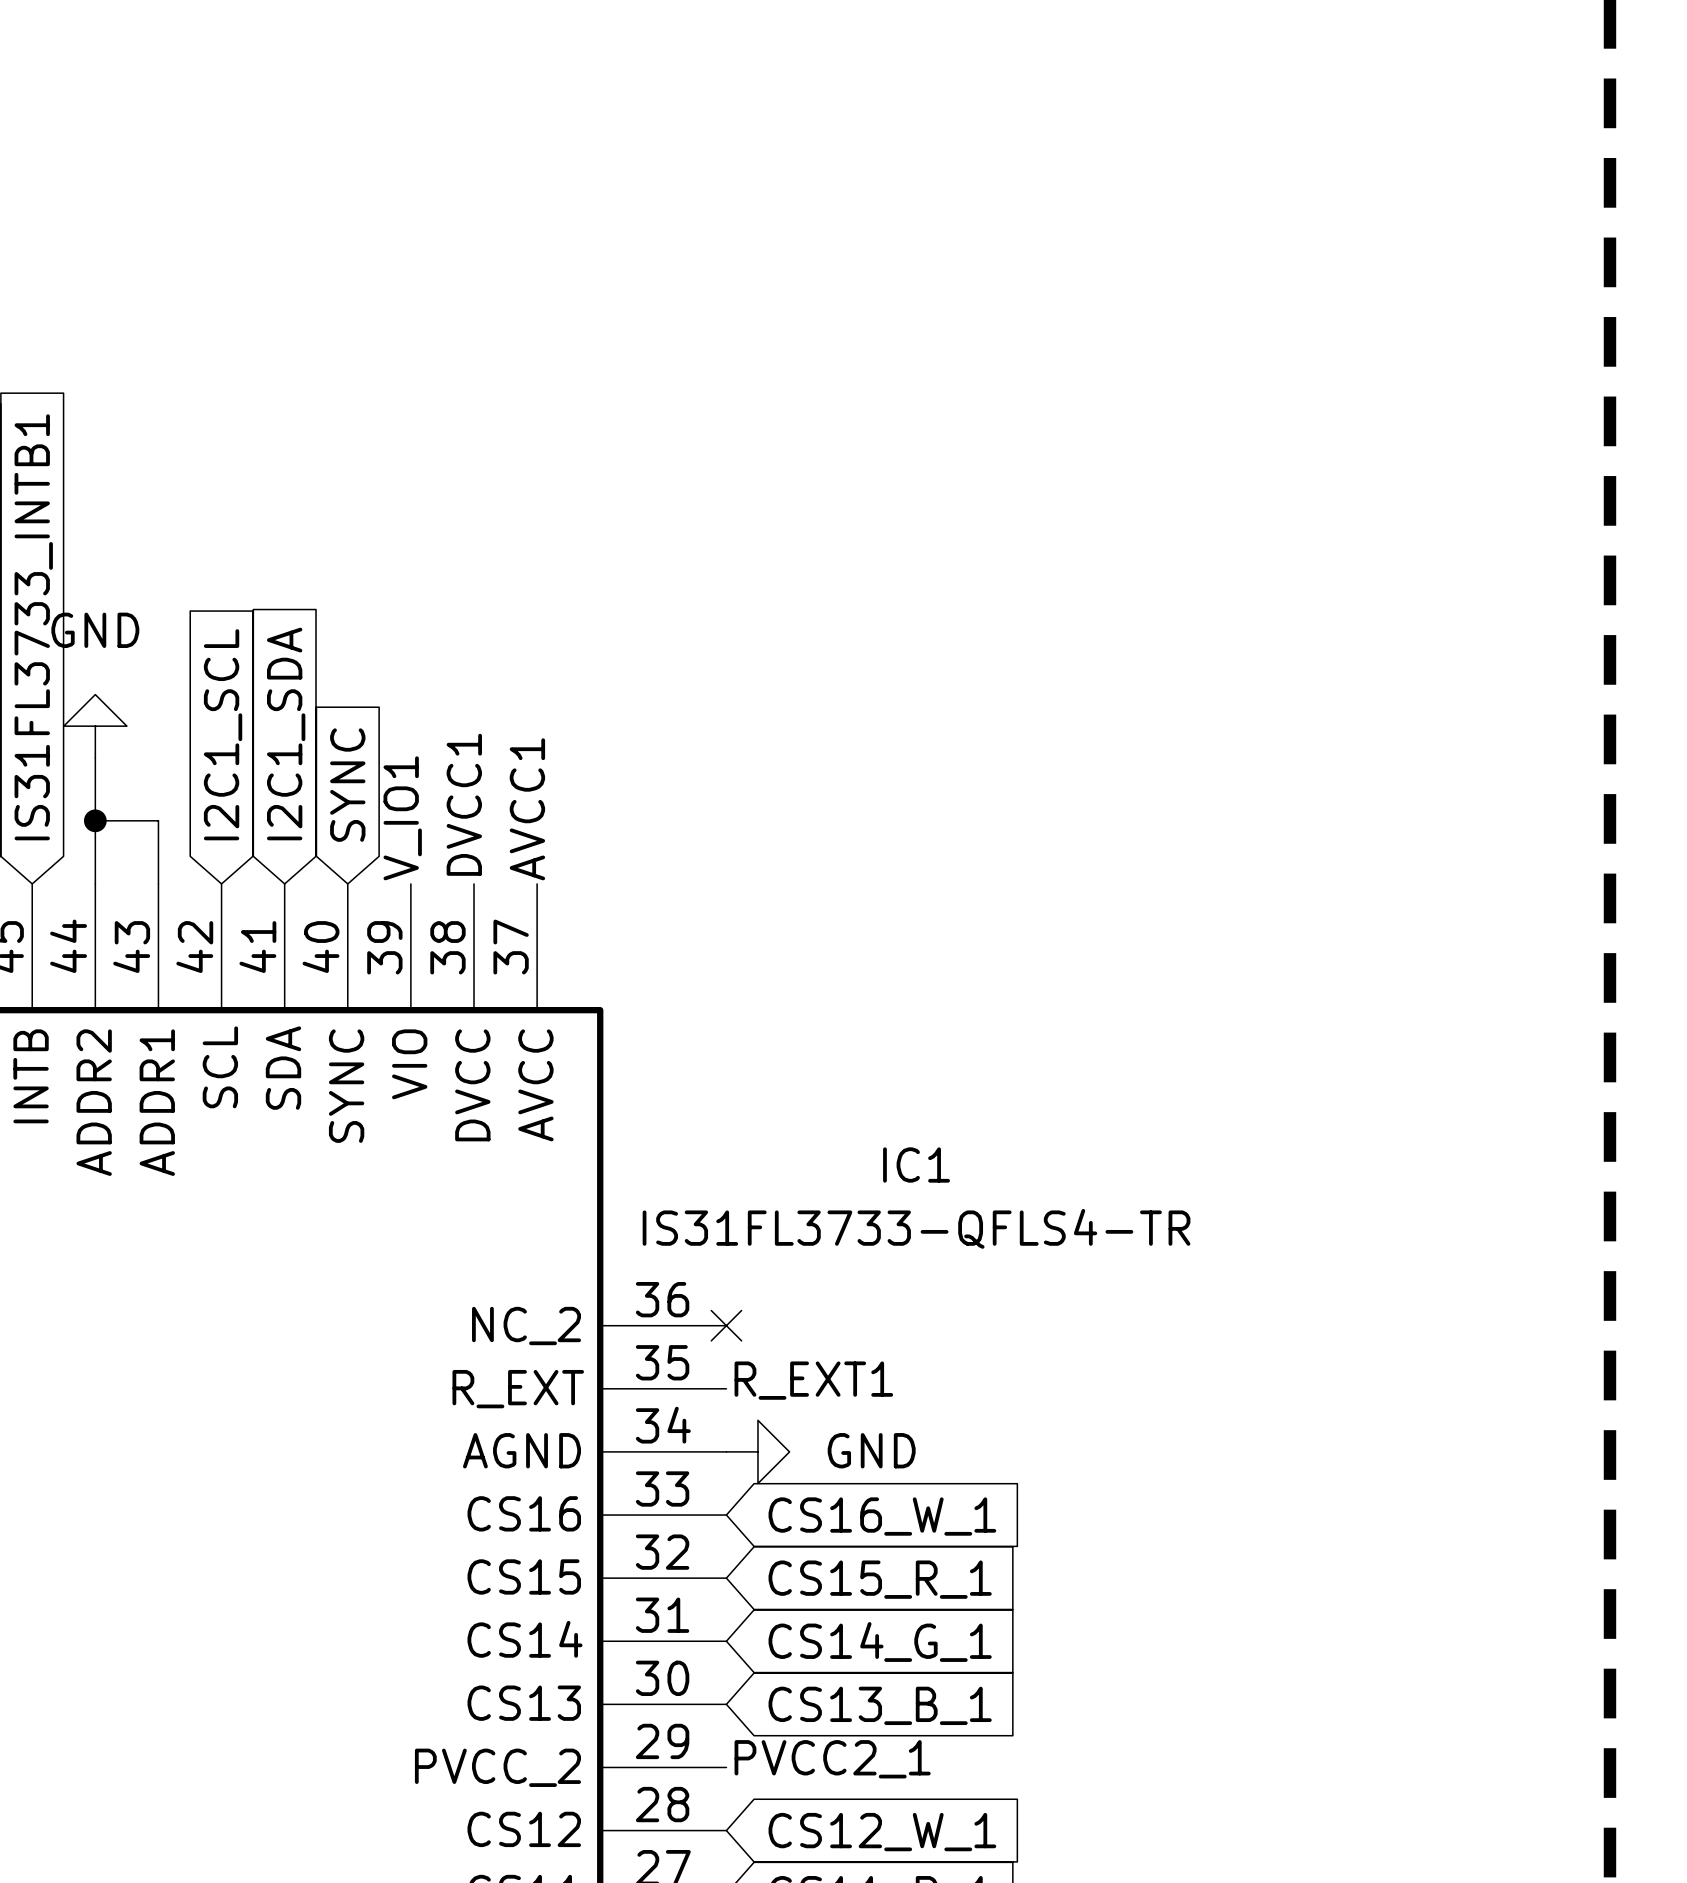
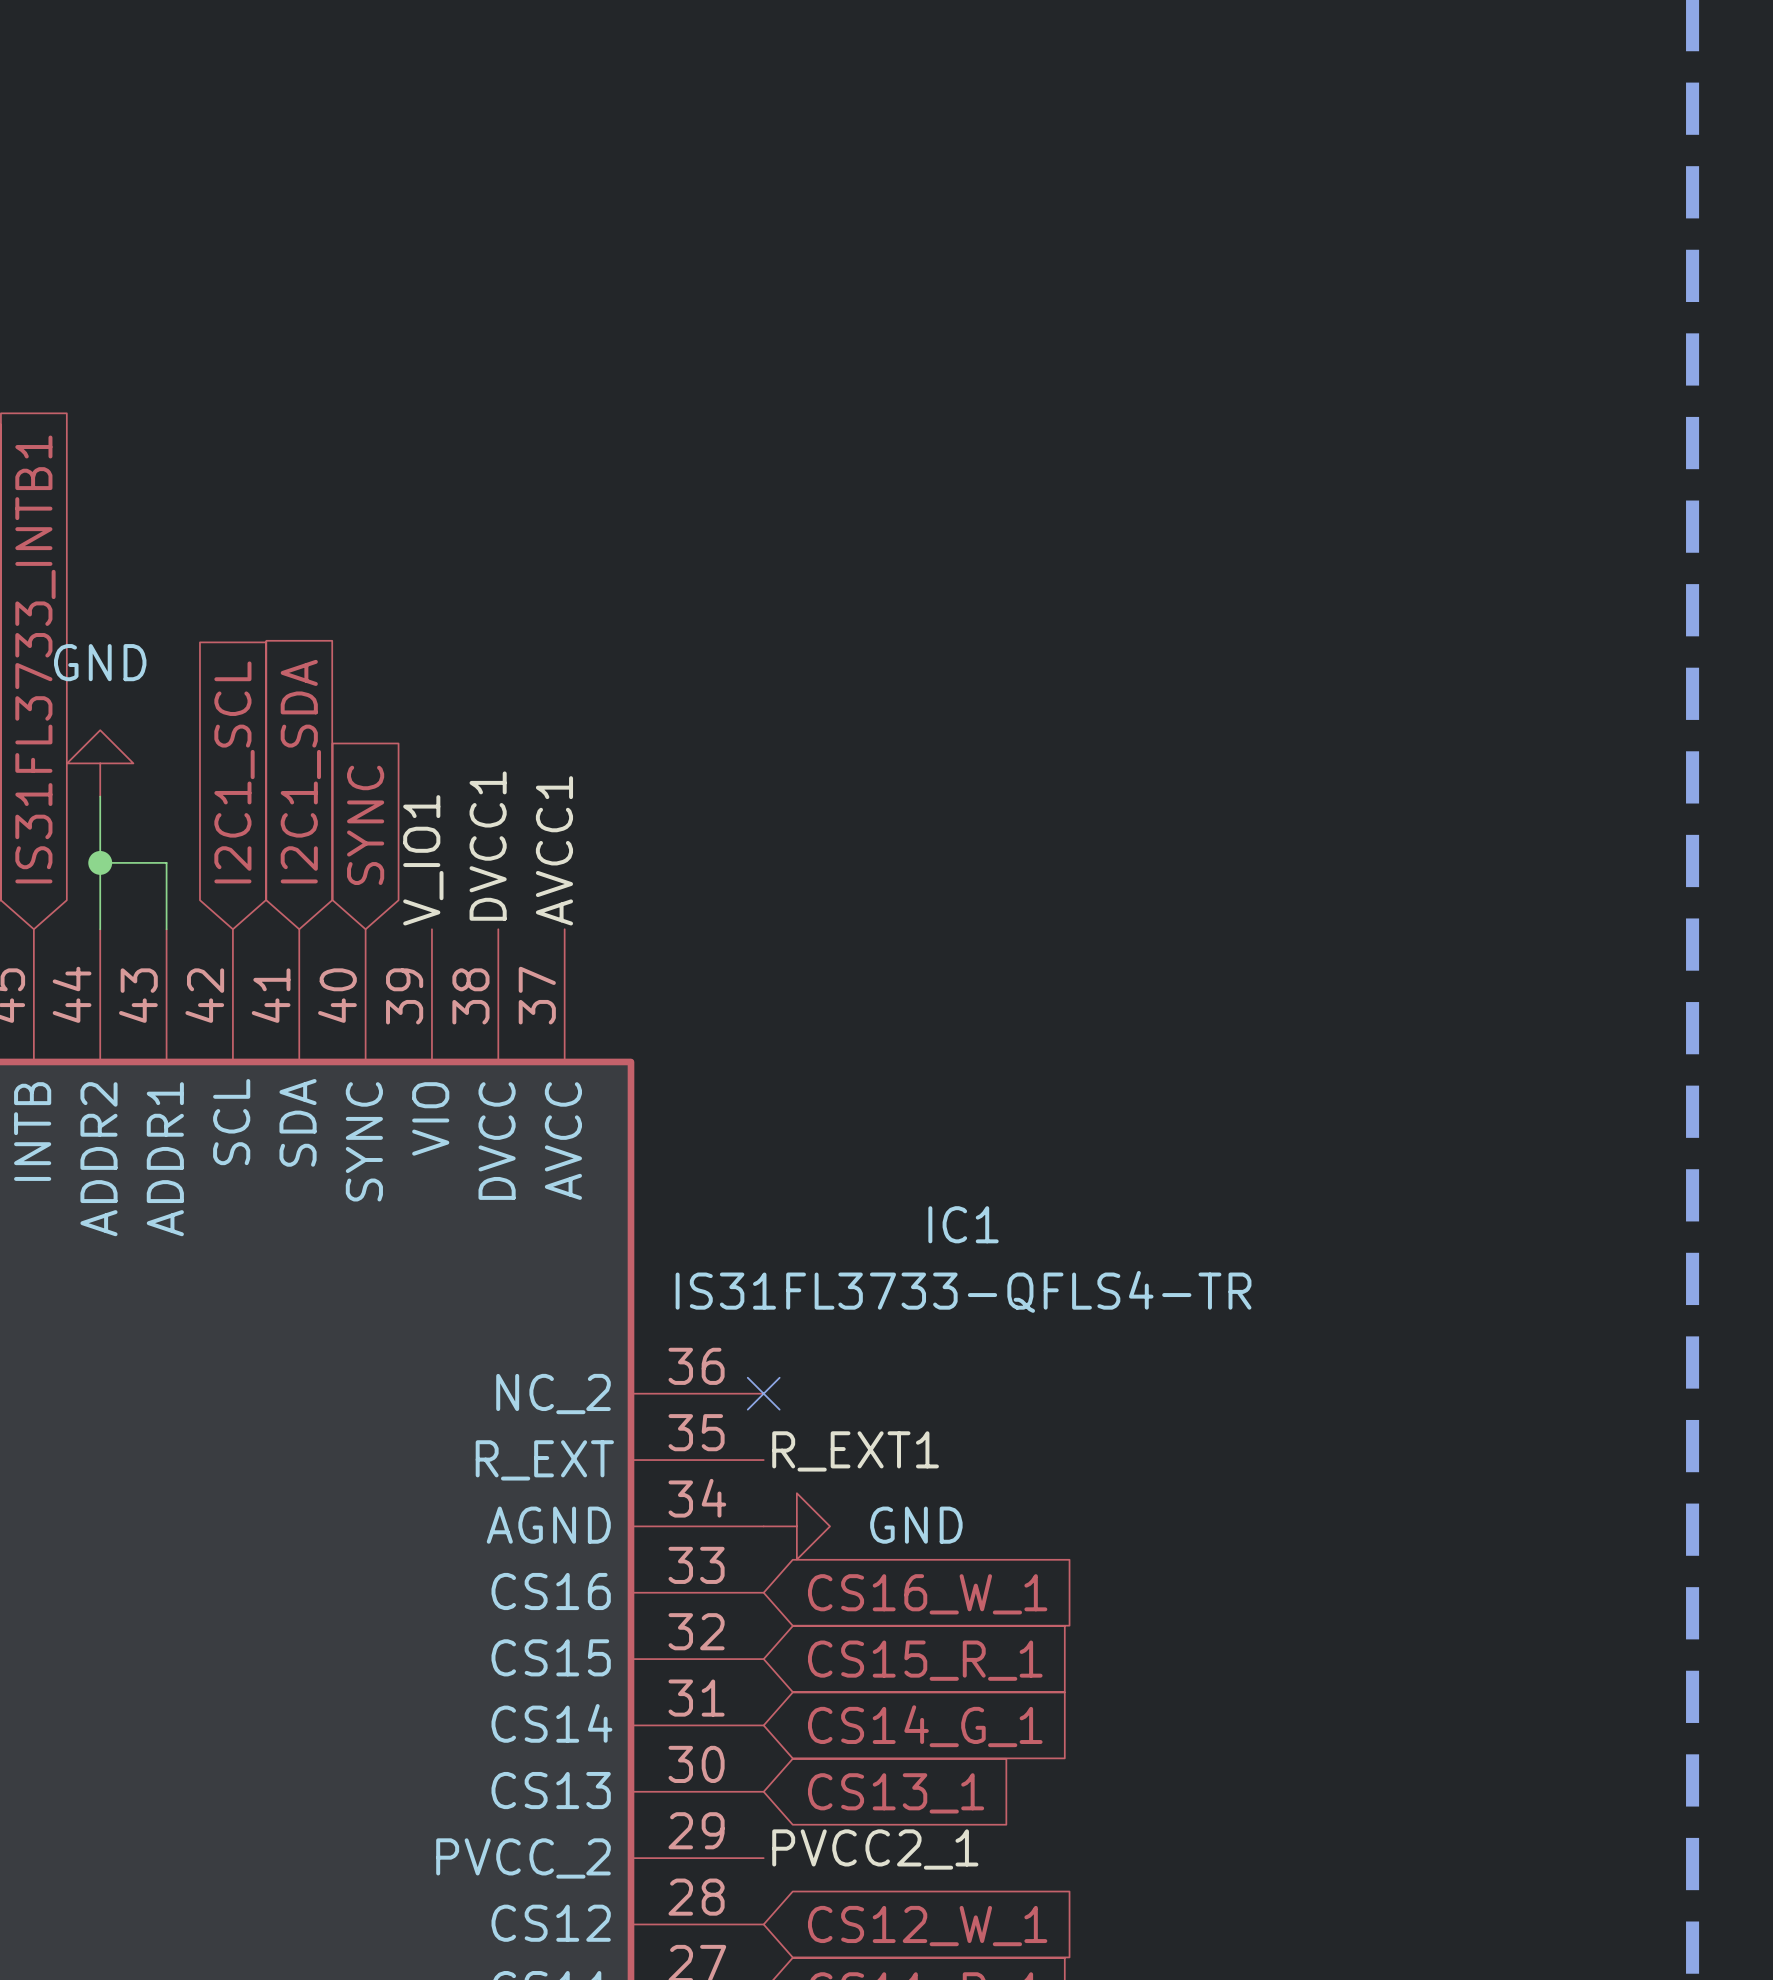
global label: CS13_B_1 (880, 1705) -> CS13_1 (896, 1793)

